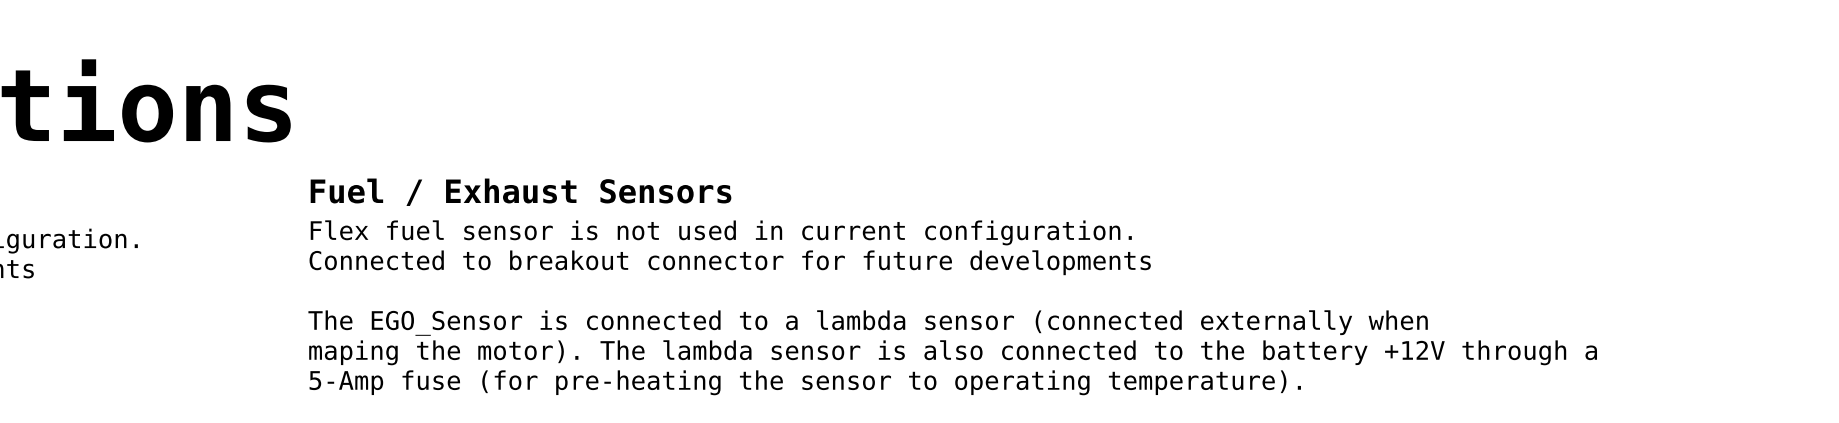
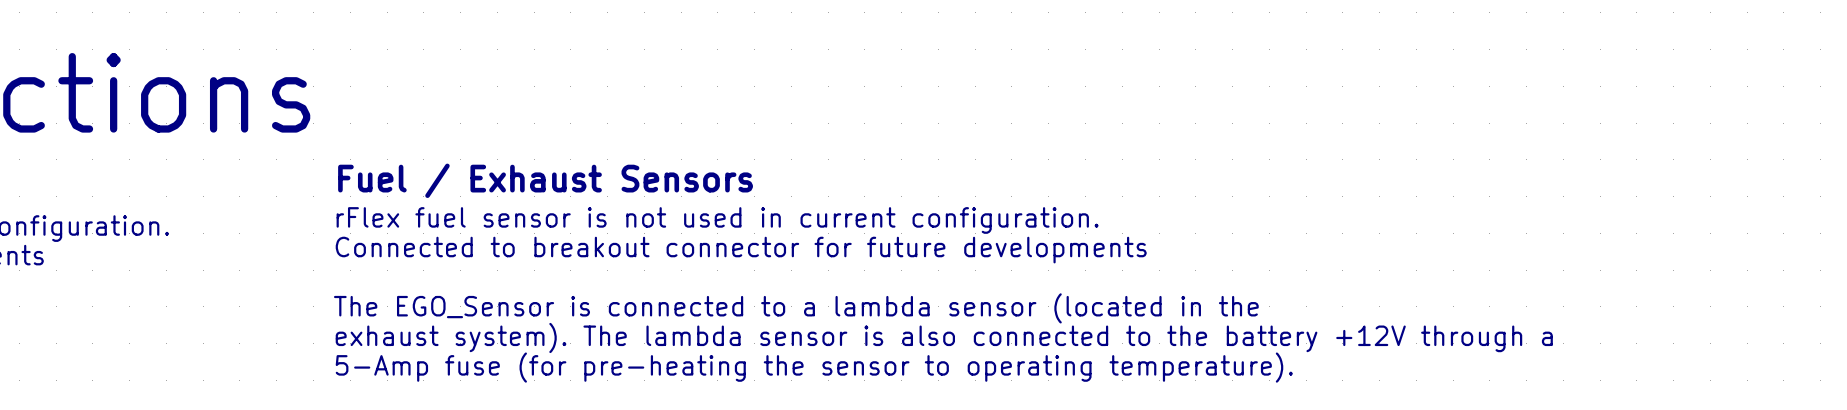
text: Flex fuel sensor is not used in current configuration. (721, 232) -> rFlex fuel sensor is not used in current configuration. (717, 220)
text: The EGO_Sensor is connected to a lambda sensor (connected externally when (868, 323) -> The EGO_Sensor is connected to a lambda sensor (located in the (796, 308)
text: maping the motor). The lambda sensor is also connected to the battery +12V through a (953, 352) -> exhaust system). The lambda sensor is also connected to the battery +12V through a (944, 337)

